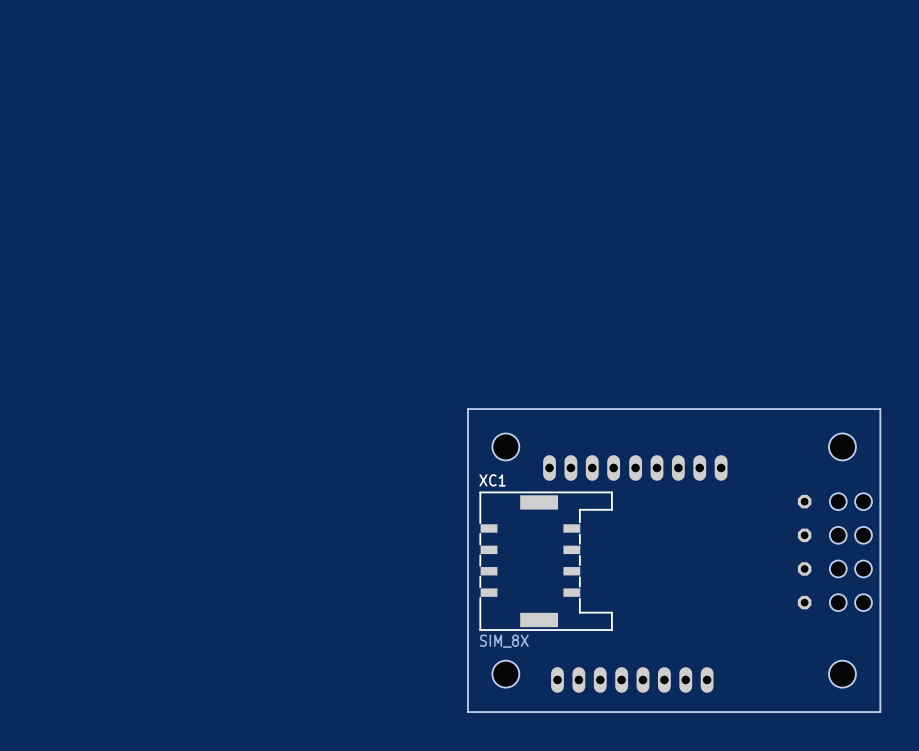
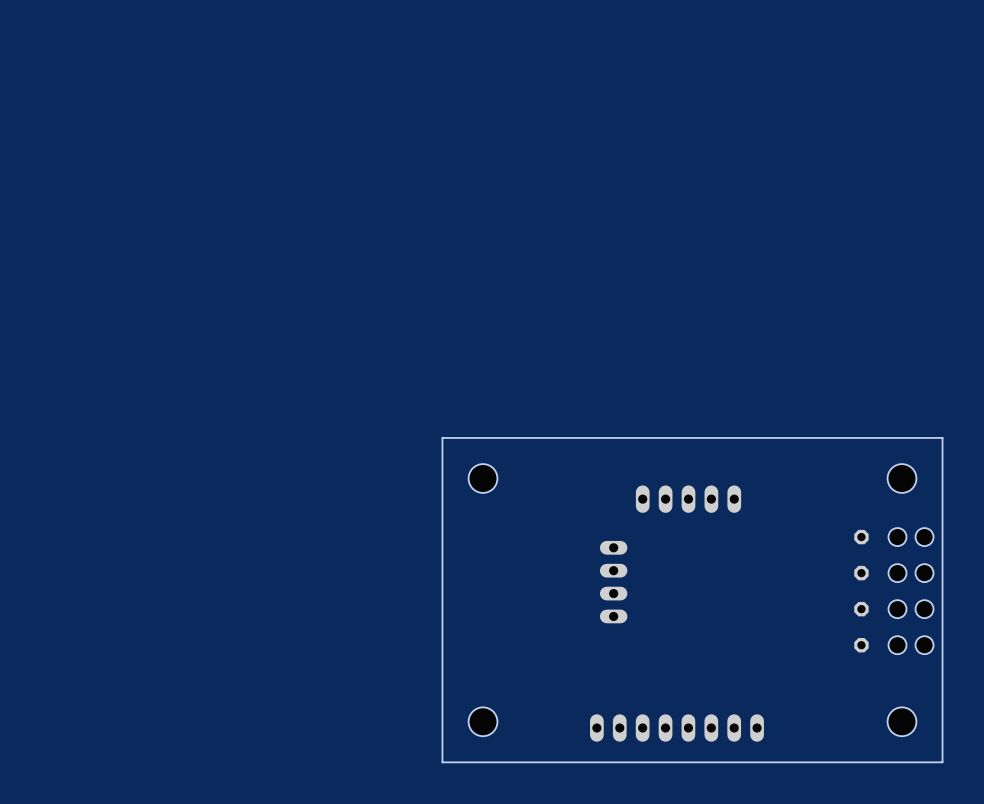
board edge: (467, 409) (467, 712) -> (501, 437) (442, 437) (442, 762) (501, 762)
part position: (505, 446) -> (483, 478)
part rotation: 0° (581, 467) -> 90° clockwise (613, 582)
part position: (581, 467) -> (613, 582)
part position: (678, 467) -> (688, 499)
XC1: SIM_8X (546, 561) -> none
part position: (505, 674) -> (483, 721)

